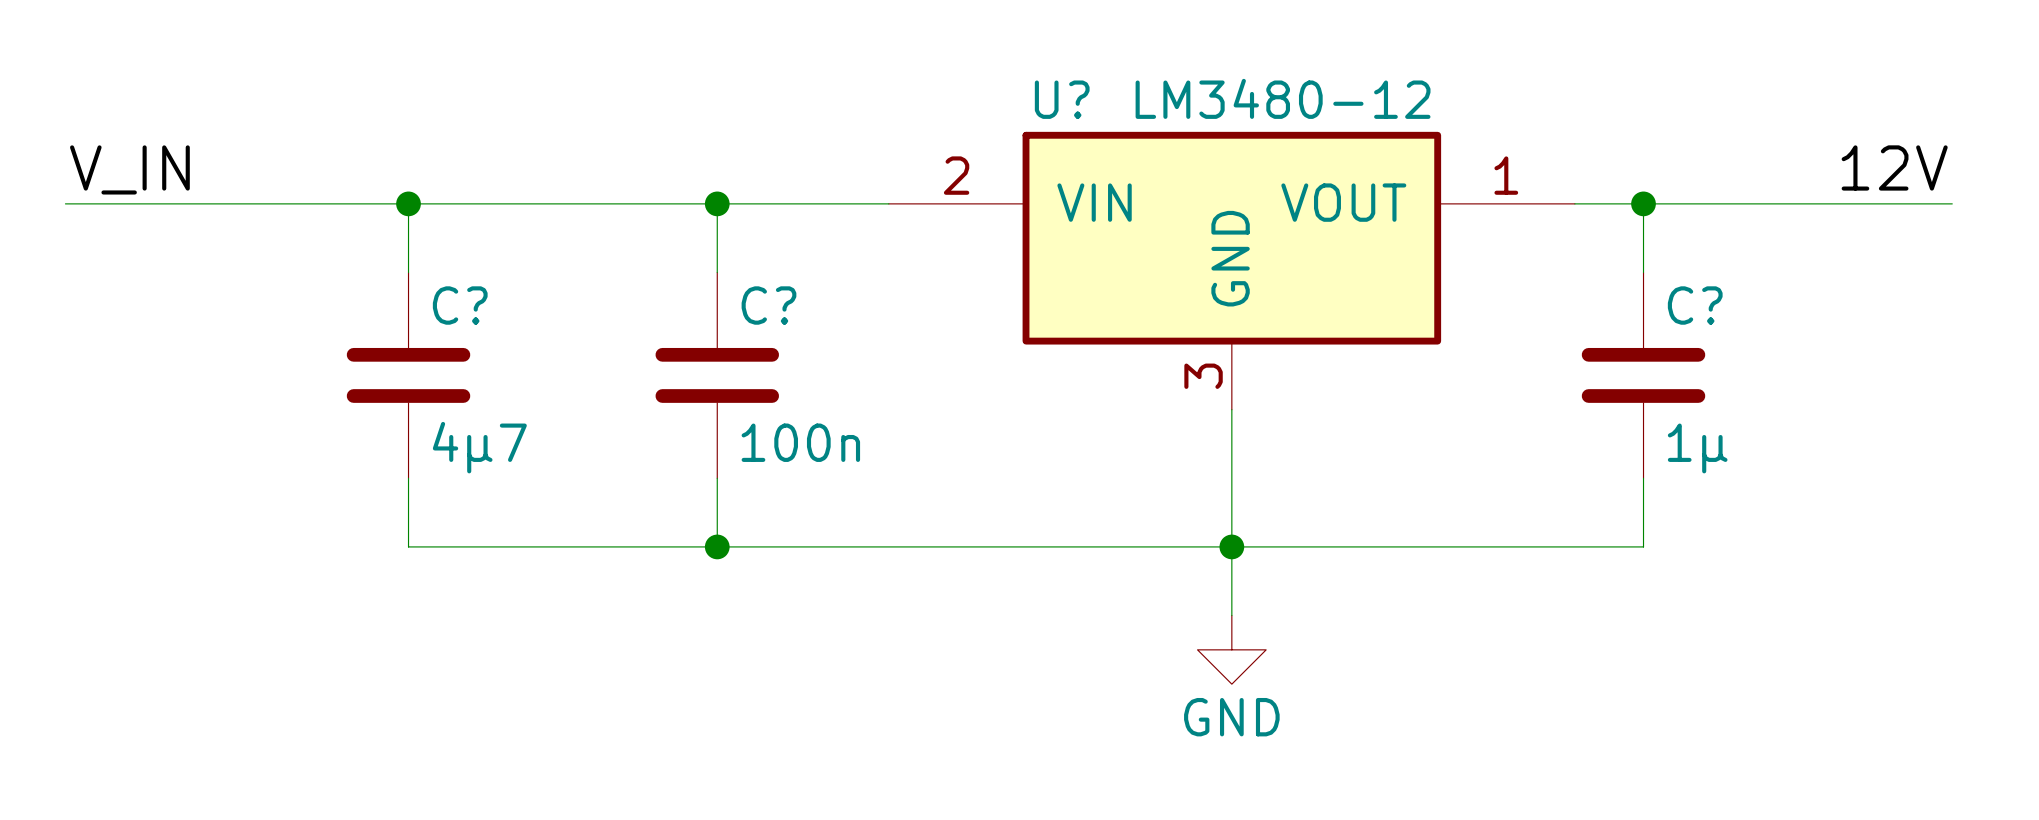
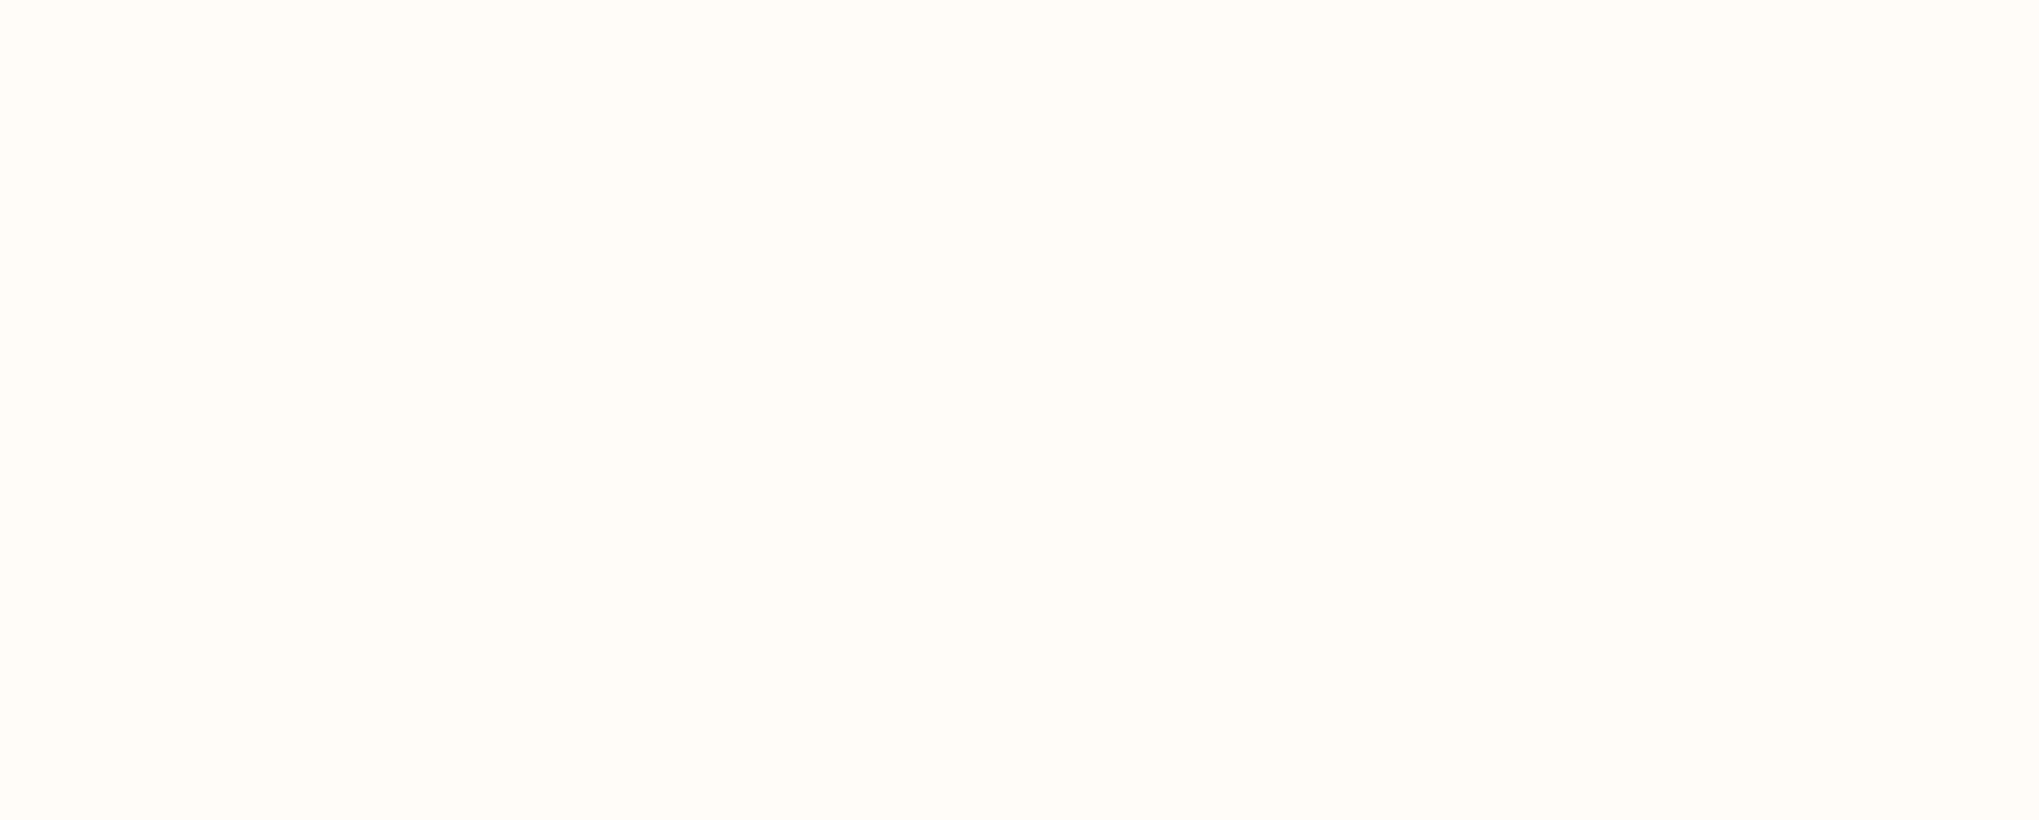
label: 12V (1894, 167) -> none
label: V_IN (129, 169) -> none
wire: (65, 203) (888, 203) -> none
wire: (408, 203) (408, 272) -> none
junction: (408, 203) -> none
wire: (717, 203) (717, 272) -> none
junction: (717, 203) -> none
wire: (1574, 203) (1952, 203) -> none
wire: (1643, 203) (1643, 272) -> none
junction: (1643, 203) -> none
U?: LM3480-12 (1231, 270) -> none
C?: 4µ7 (408, 375) -> none
C?: 100n (717, 375) -> none
C?: 1µ (1643, 375) -> none
wire: (1231, 409) (1231, 615) -> none
wire: (408, 478) (408, 546) (1643, 546) (1643, 478) -> none
wire: (717, 478) (717, 546) -> none
junction: (717, 546) -> none
junction: (1231, 546) -> none
power symbol: GND (1231, 649) -> none

